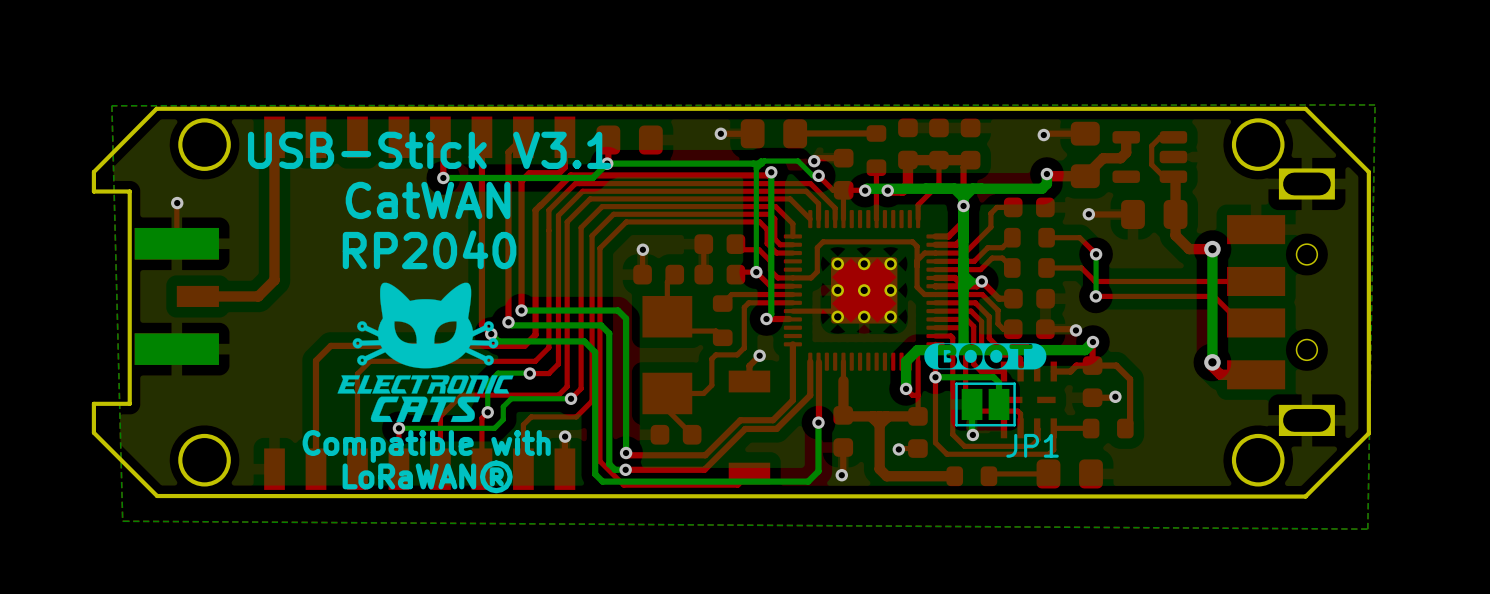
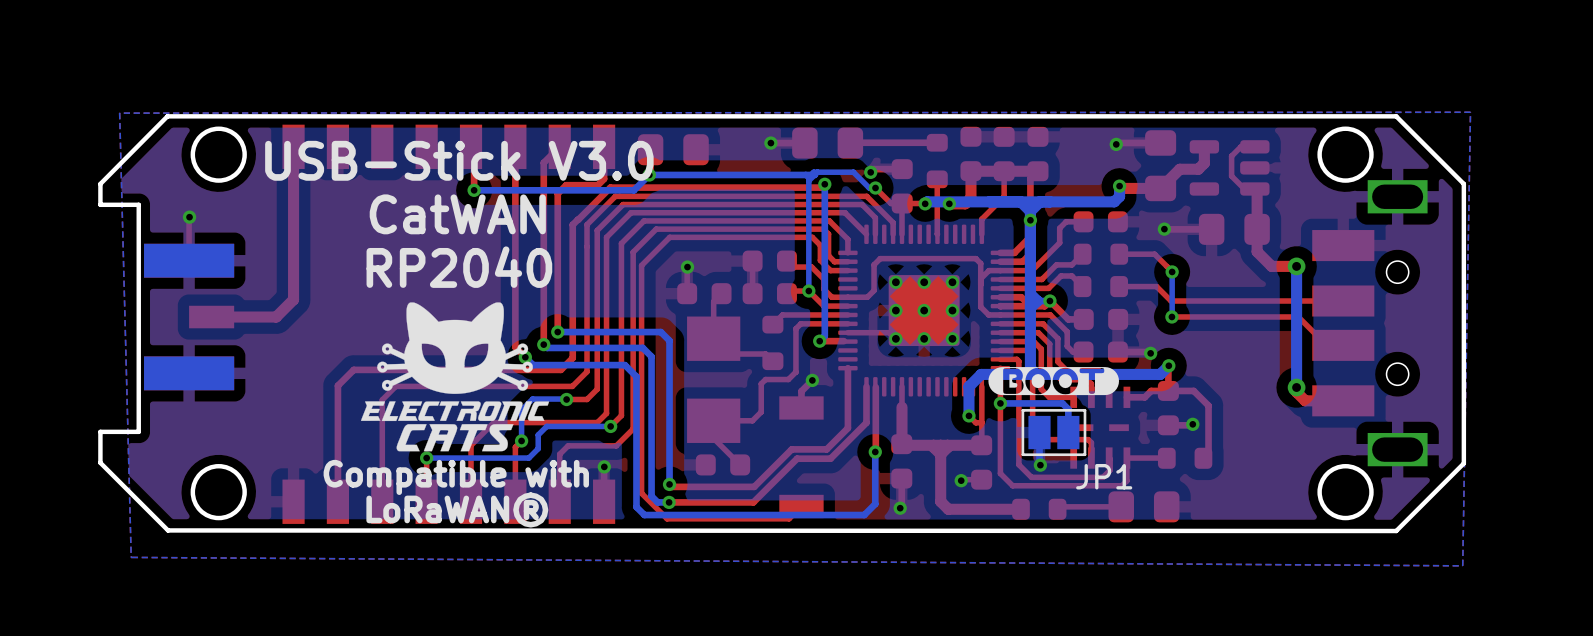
text: USB-Stick V3.1 (429, 150) -> USB-Stick V3.0 (459, 160)

